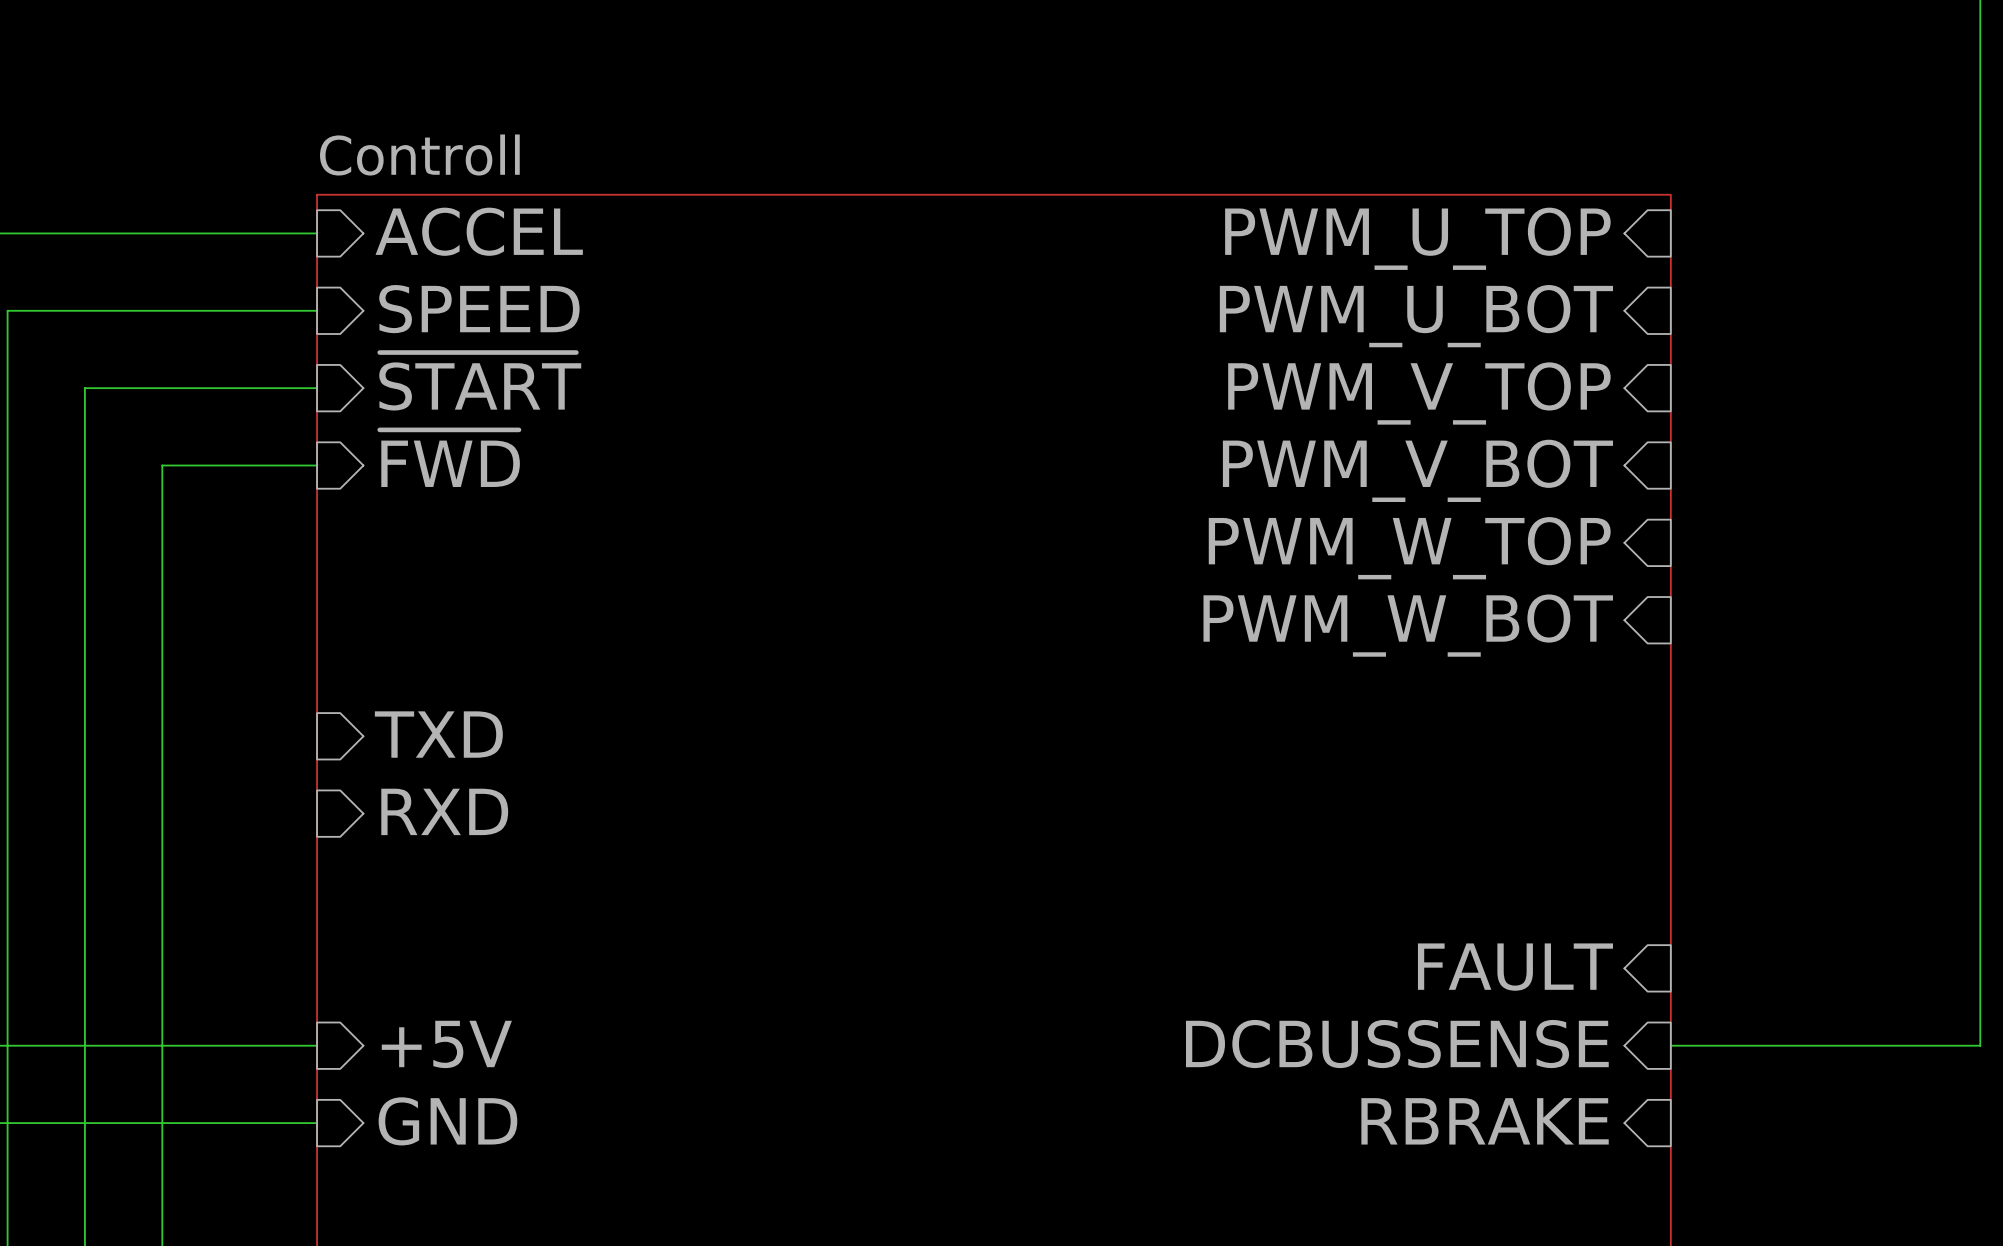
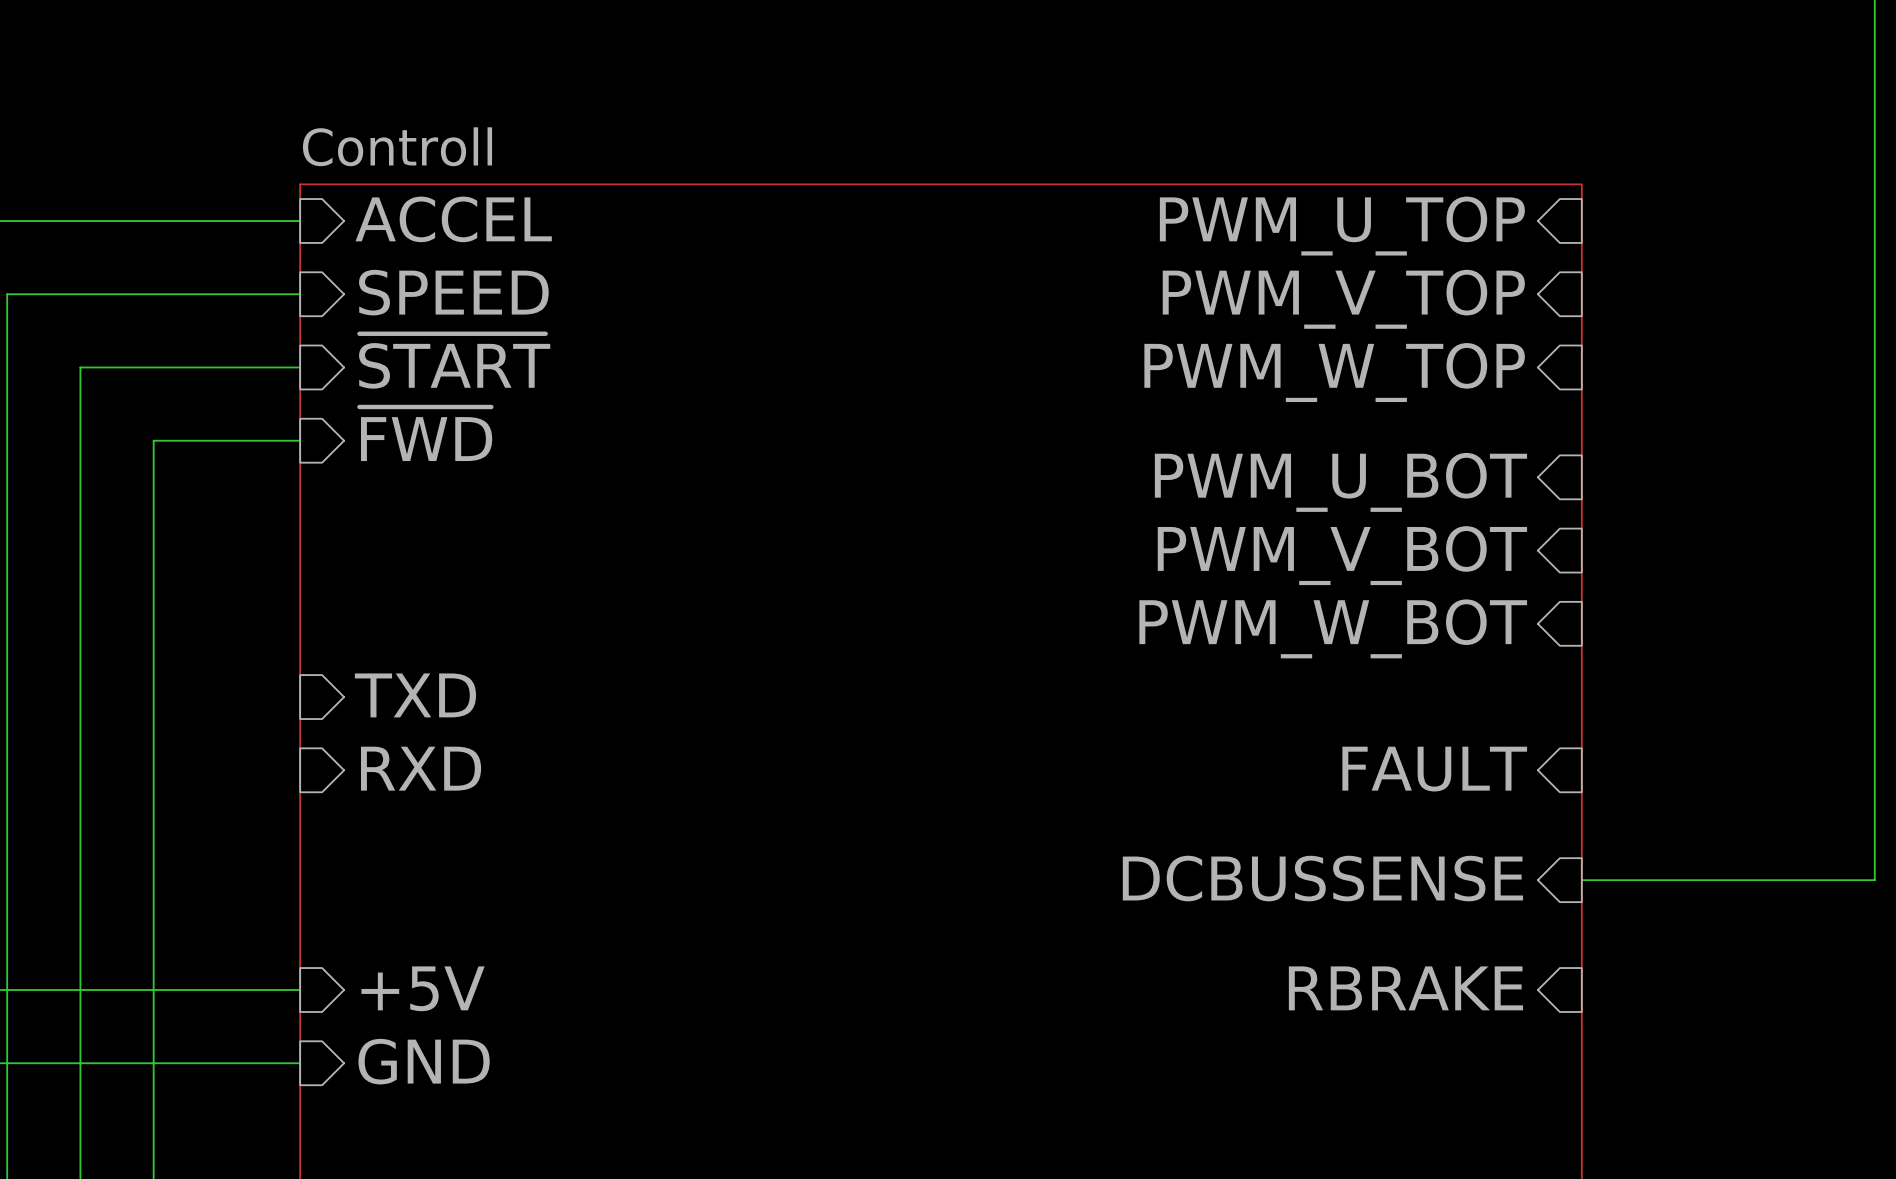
sheet pin: PWM_U_BOT (1416, 316) -> PWM_V_TOP (1343, 299)
sheet pin: PWM_V_TOP (1419, 393) -> PWM_W_TOP (1334, 372)
sheet pin position: PWM_V_BOT (1417, 470) -> PWM_V_BOT (1342, 555)
sheet pin: PWM_W_TOP (1409, 548) -> PWM_U_BOT (1340, 482)
sheet pin position: PWM_W_BOT (1408, 625) -> PWM_W_BOT (1333, 628)
sheet pin: none -> DCBUSSENSE (1322, 878)
wire: (1980, 929) (1980, 1045) (1670, 1045) -> (1874, 880) (1581, 880)
sheet pin position: FAULT (1515, 967) -> FAULT (1434, 769)
sheet pin: DCBUSSENSE (1397, 1044) -> RBRAKE (1405, 988)
sheet pin: RBRAKE (1485, 1121) -> none

